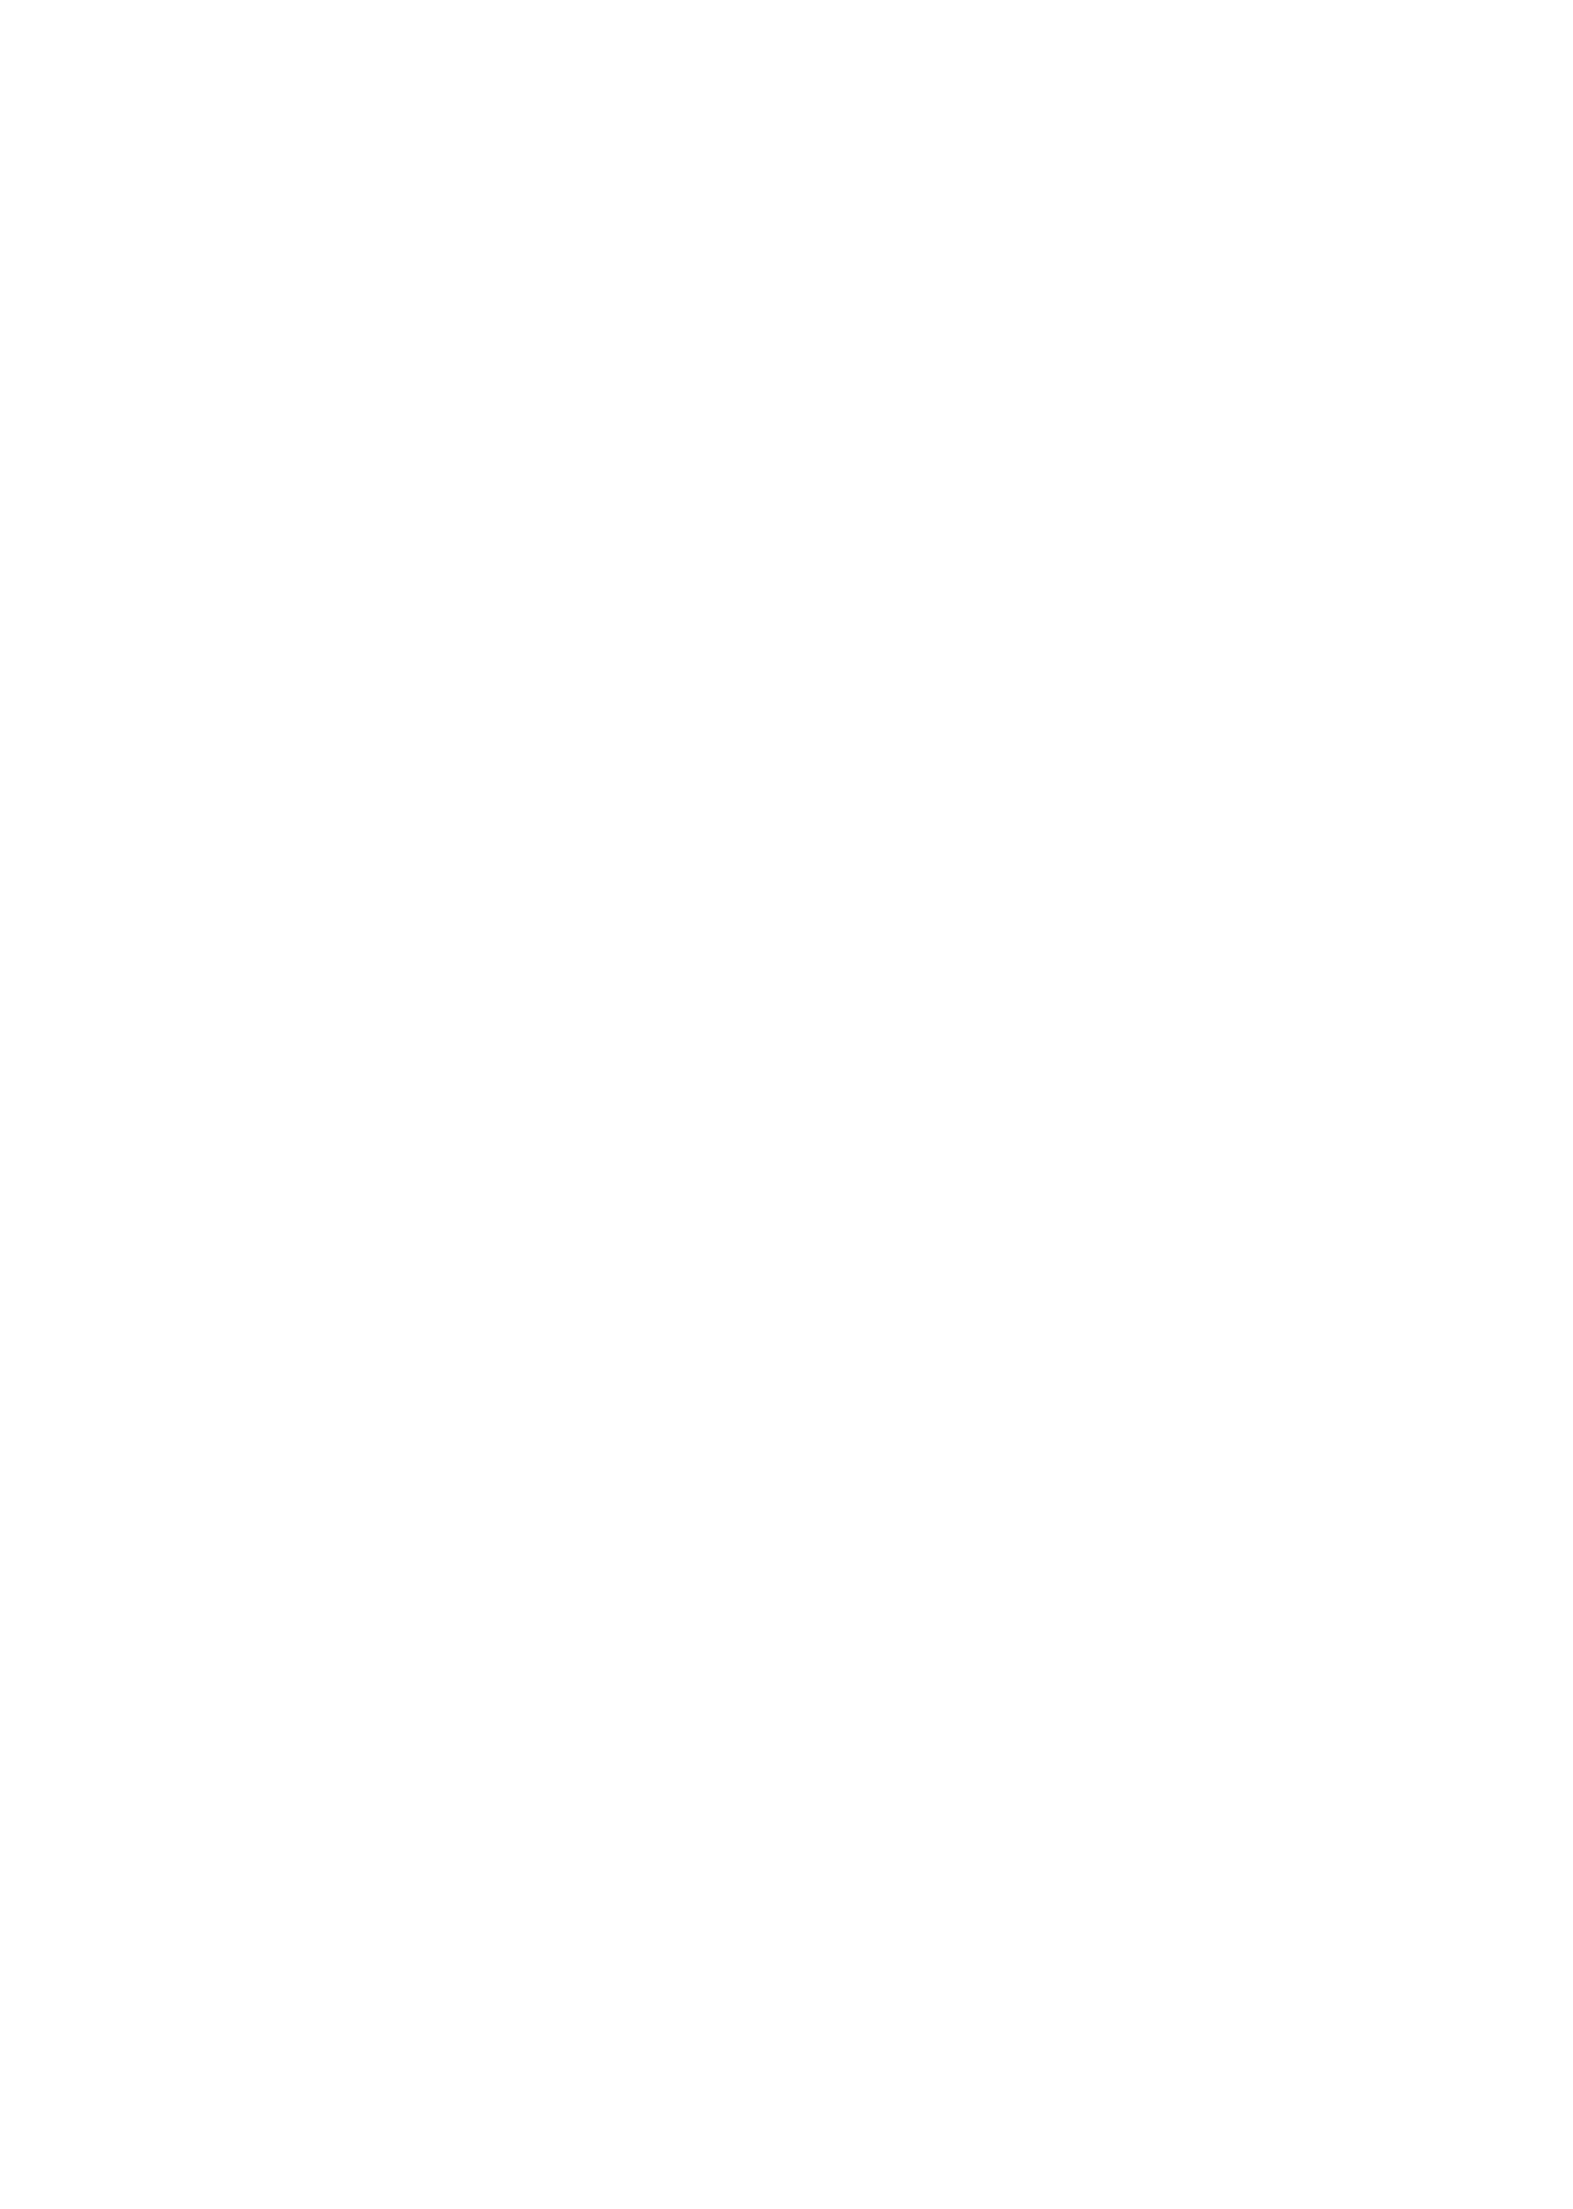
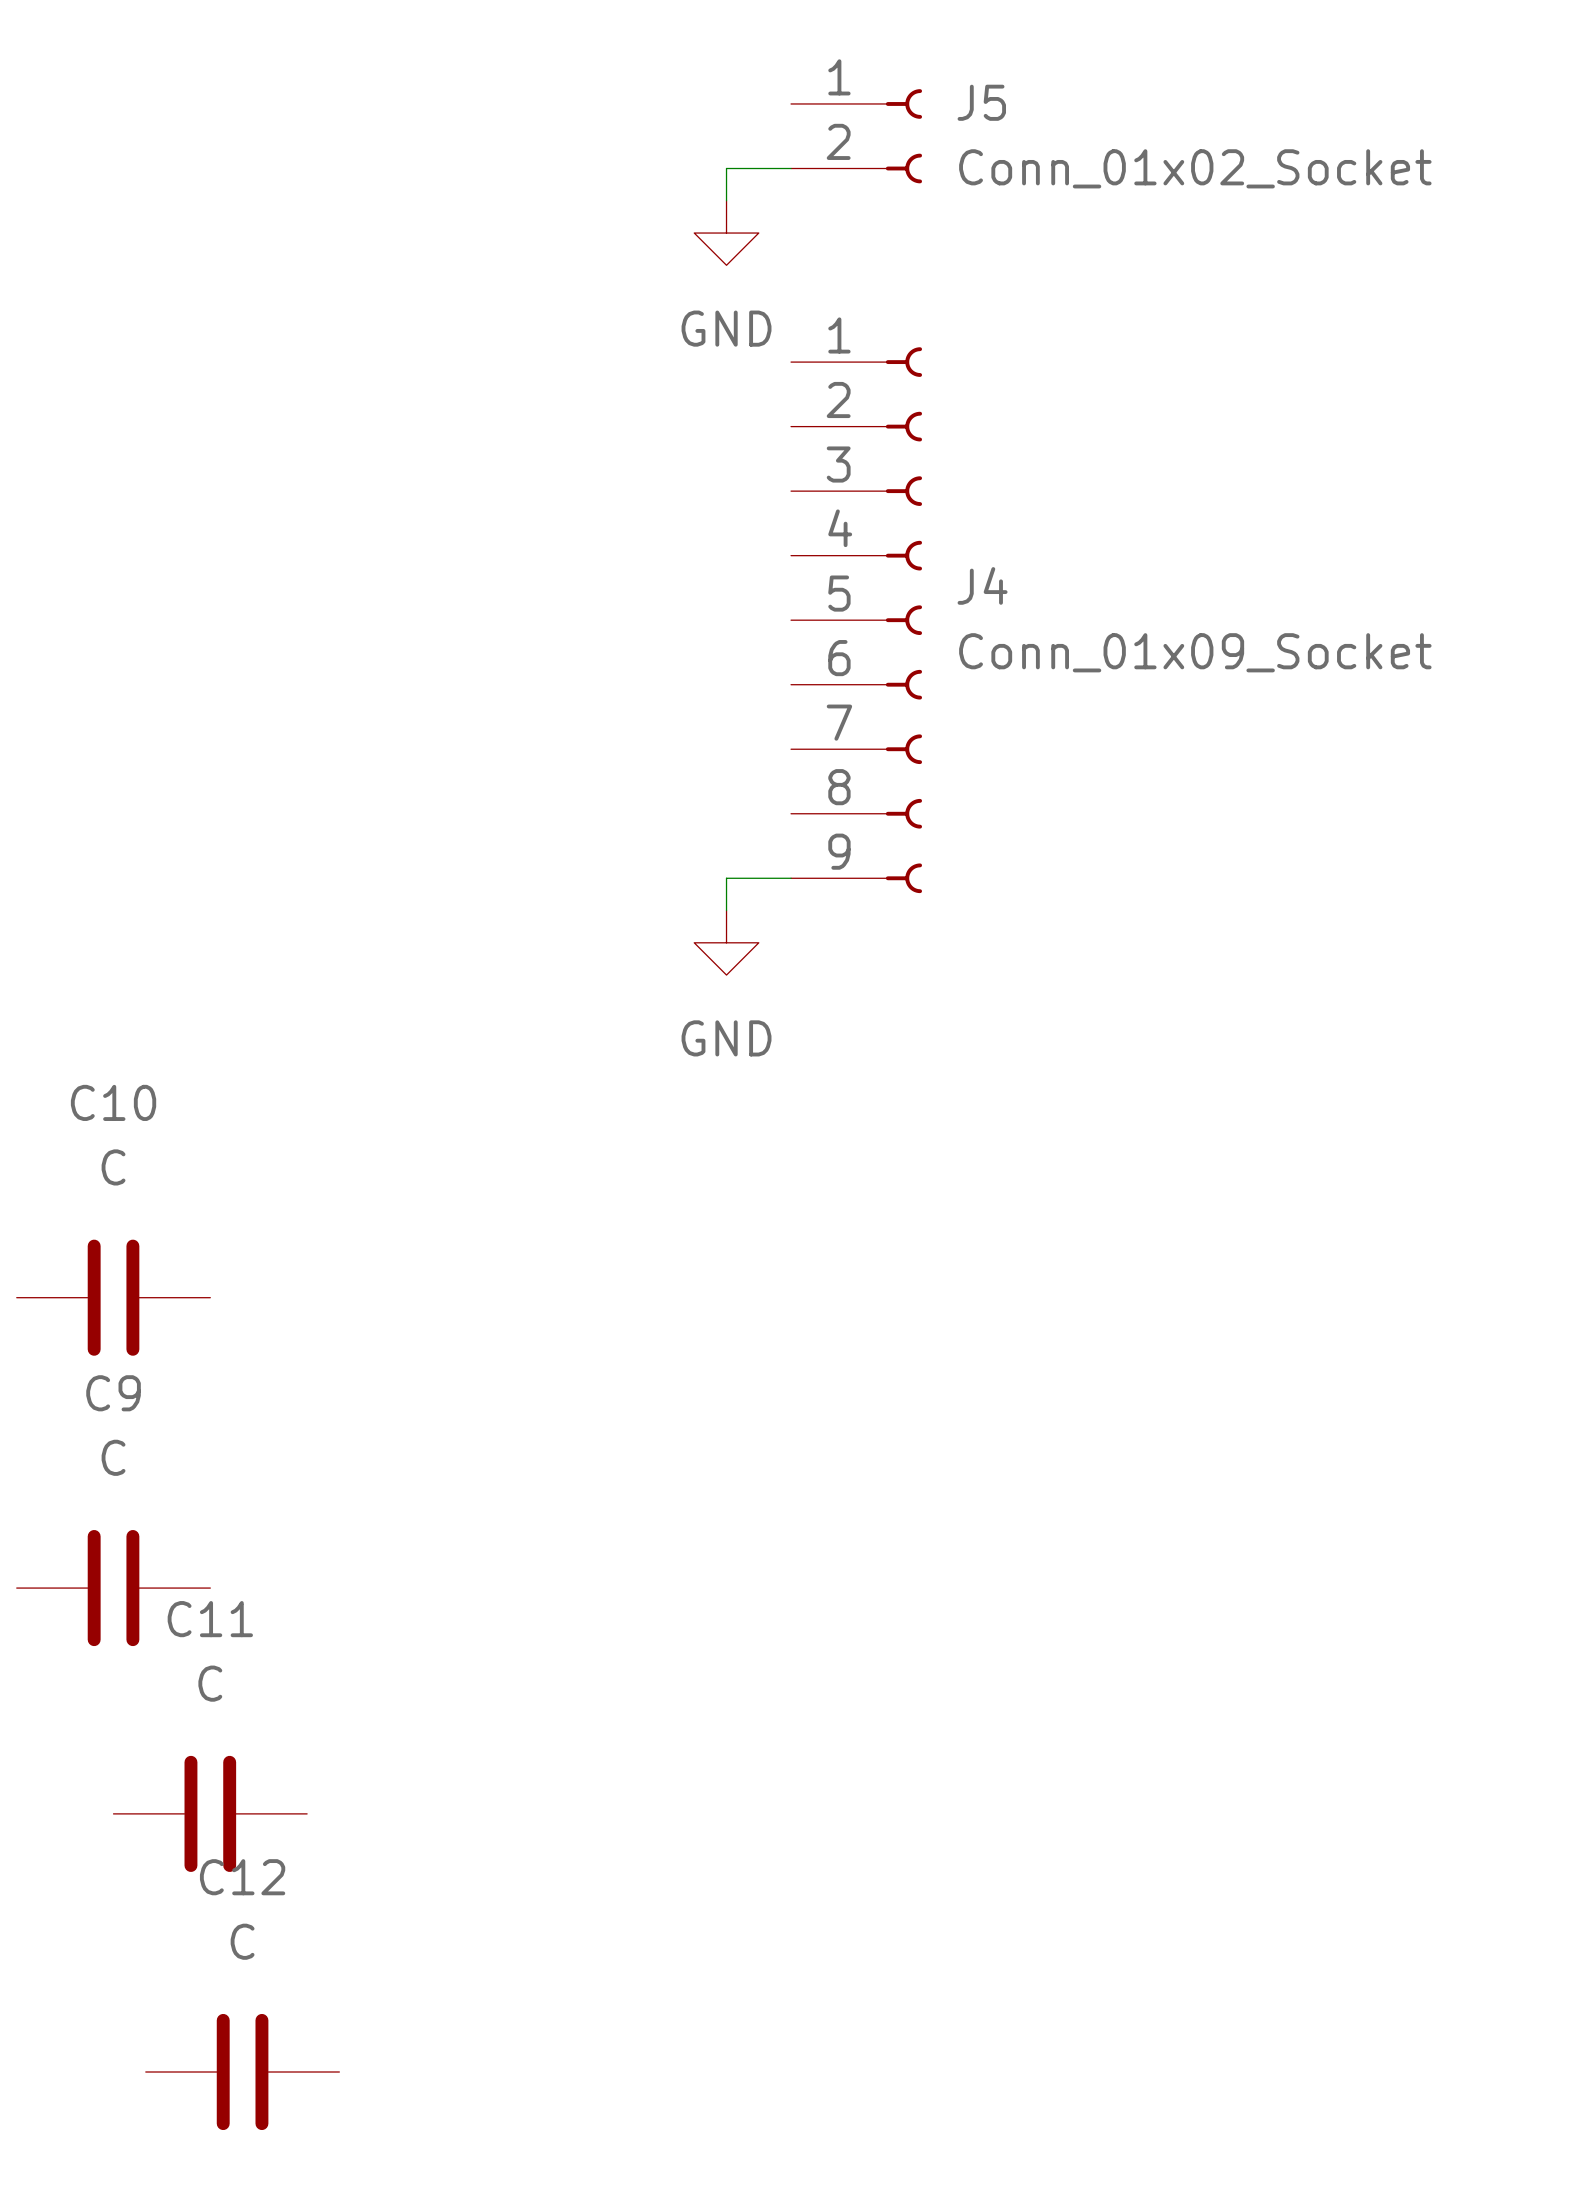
J5: none -> Conn_01x02_Socket (856, 136)
wire: none -> (791, 168) (726, 168) (726, 200)
power symbol: none -> GND (726, 233)
J4: none -> Conn_01x09_Socket (856, 620)
wire: none -> (791, 878) (726, 878) (726, 910)
power symbol: none -> GND (726, 942)
C10: none -> C (113, 1297)
C9: none -> C (113, 1588)
C11: none -> C (210, 1813)
C12: none -> C (242, 2072)

